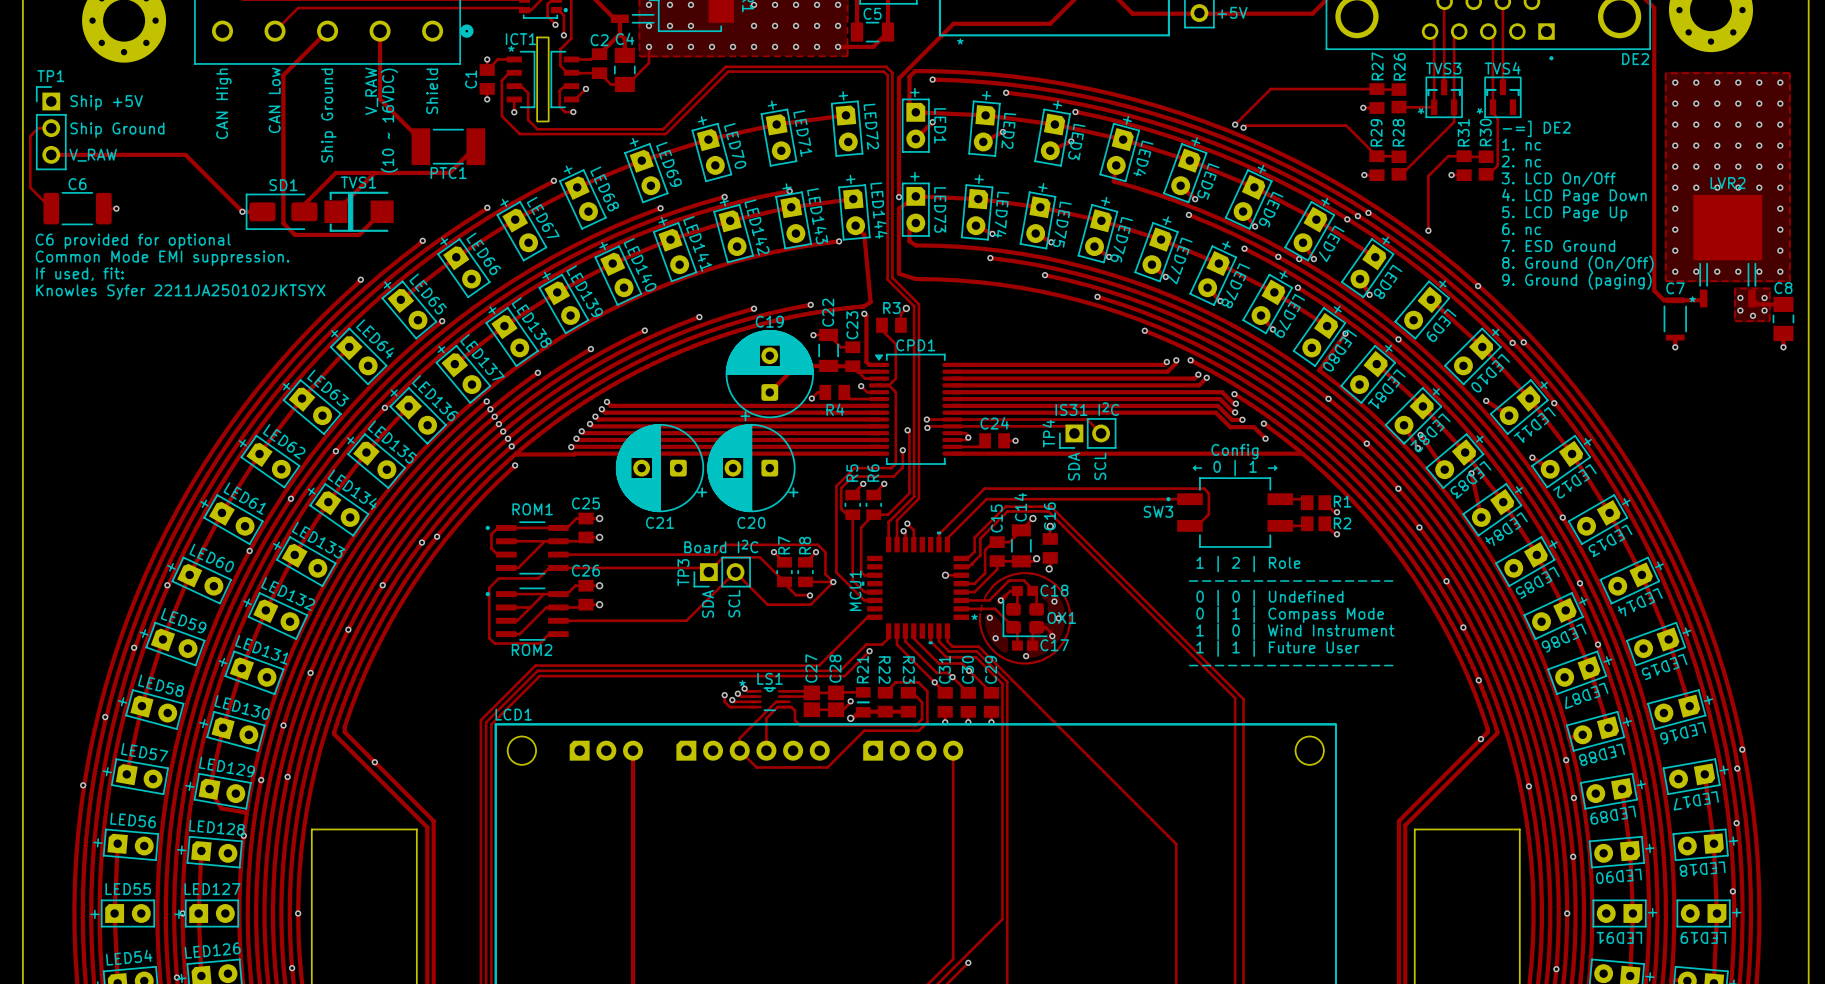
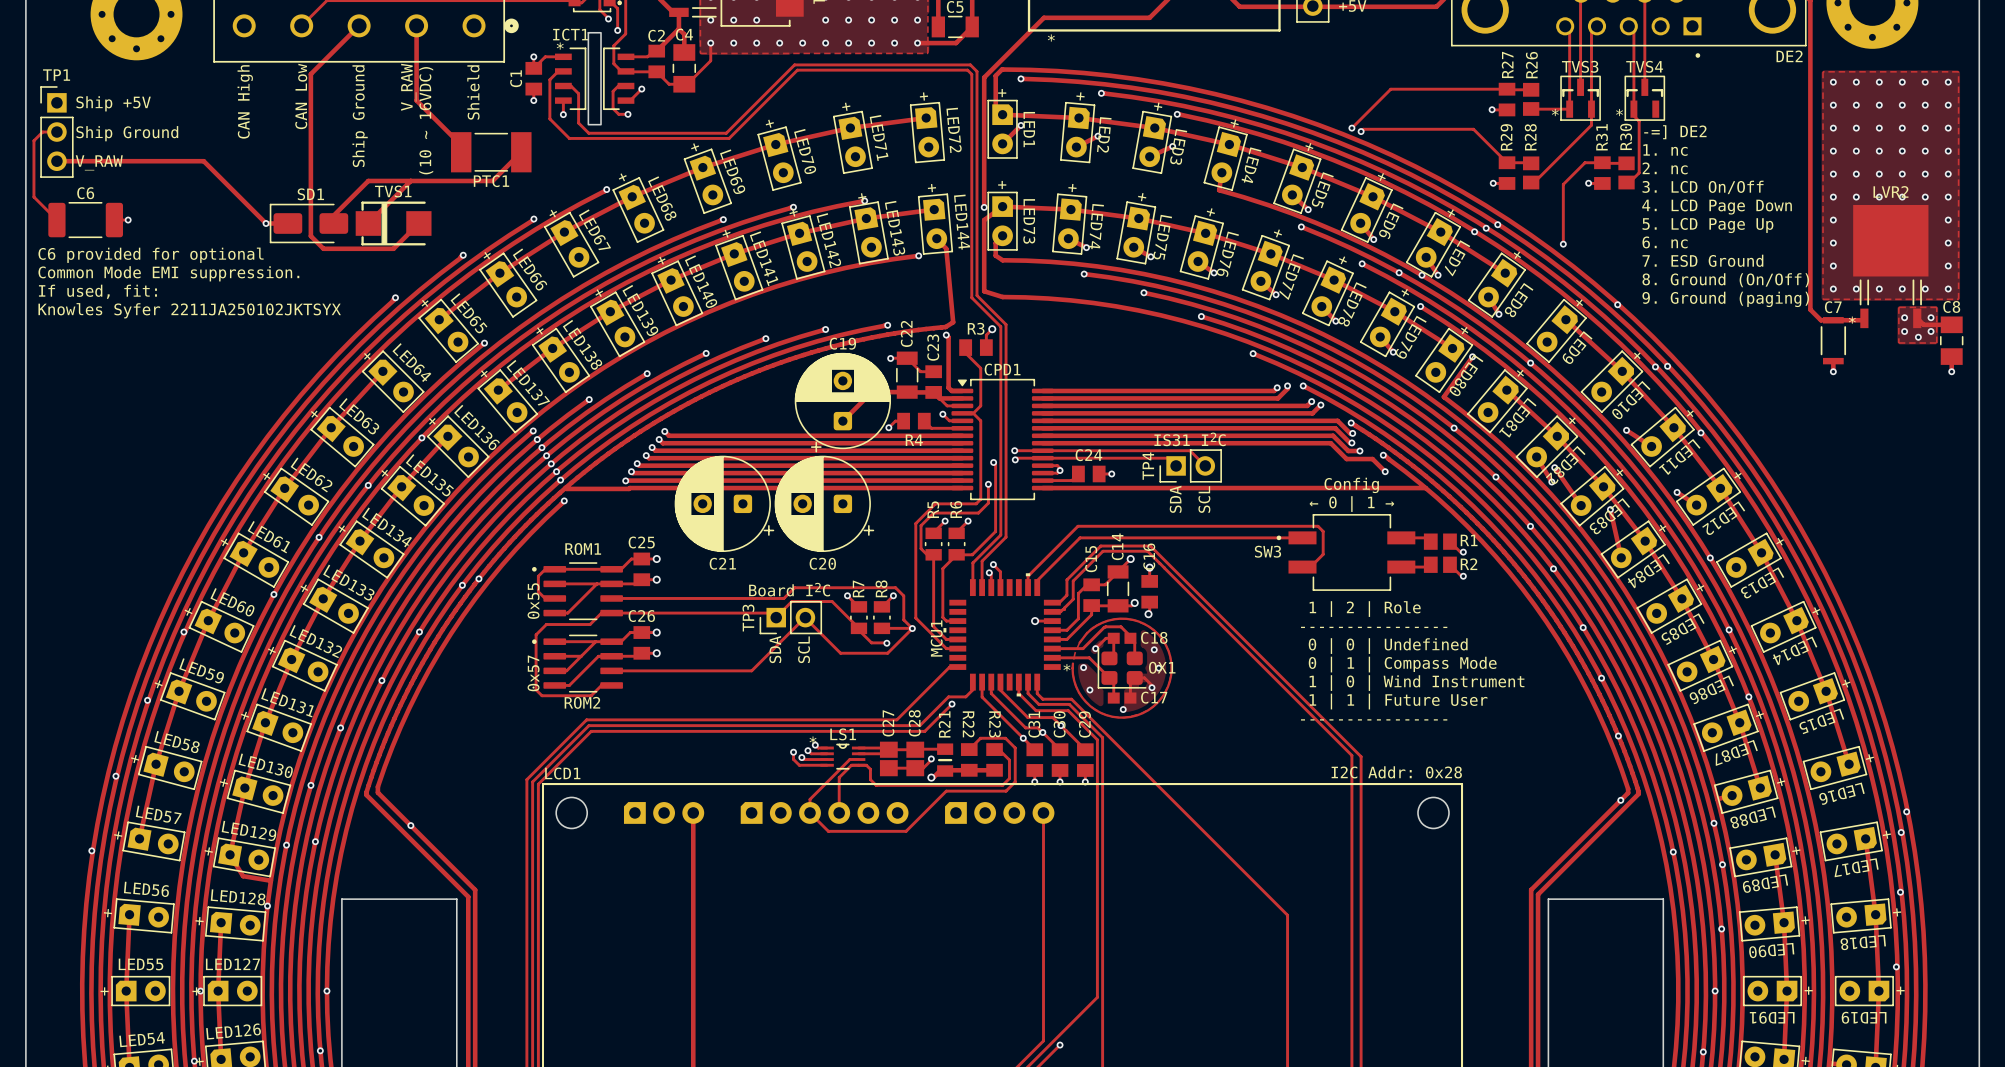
text: none -> 0x55 (533, 601)
text: none -> 0x57 (533, 673)
text: none -> I2C Addr: 0x28 (1396, 772)

